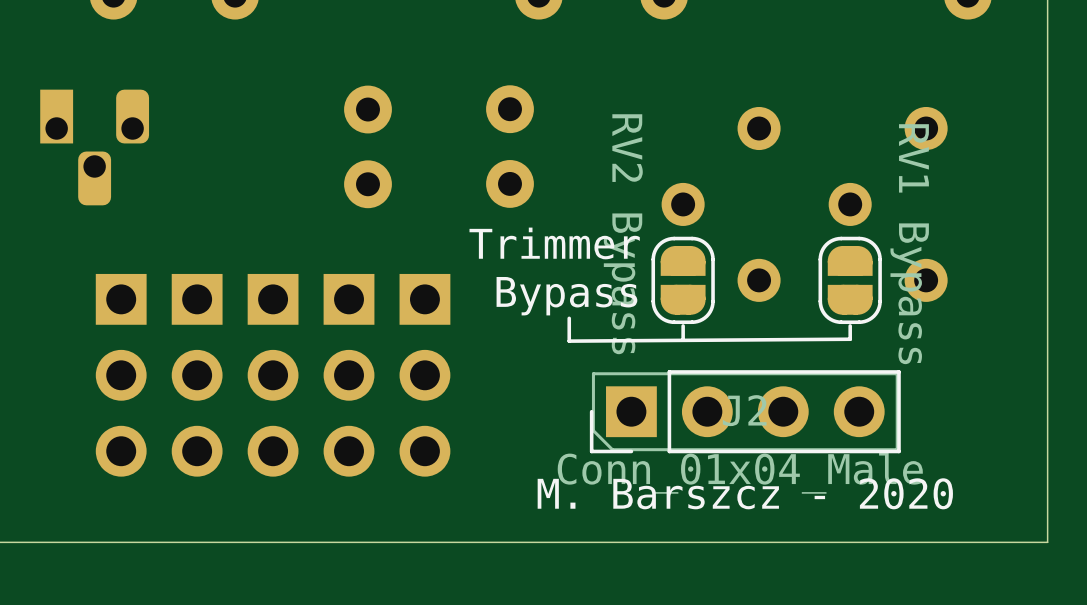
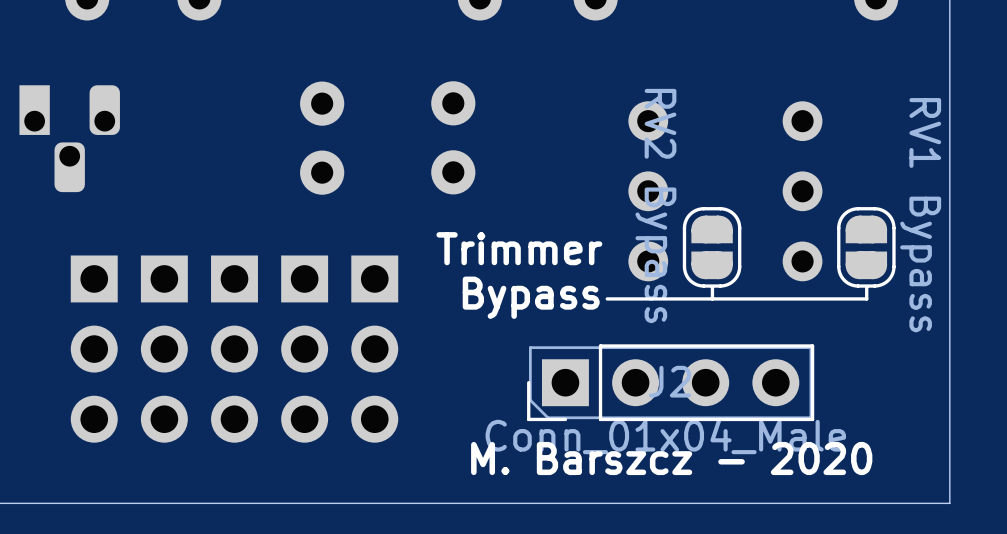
part footprint: [661, 106, 781, 302] -> [628, 101, 669, 282]
part footprint: [828, 106, 948, 302] -> [782, 101, 823, 282]
text position: Trimmer (554, 243) -> Trimmer (519, 248)
part position: (683, 280) -> (712, 247)
part position: (850, 280) -> (866, 247)
text position: Bypass (566, 296) -> Bypass (531, 297)
line: none -> (866, 286) (866, 298) (607, 298)
line: (569, 318) (569, 341) (850, 339) (850, 325) -> none
line: (683, 325) (683, 339) -> (712, 286) (712, 298)

